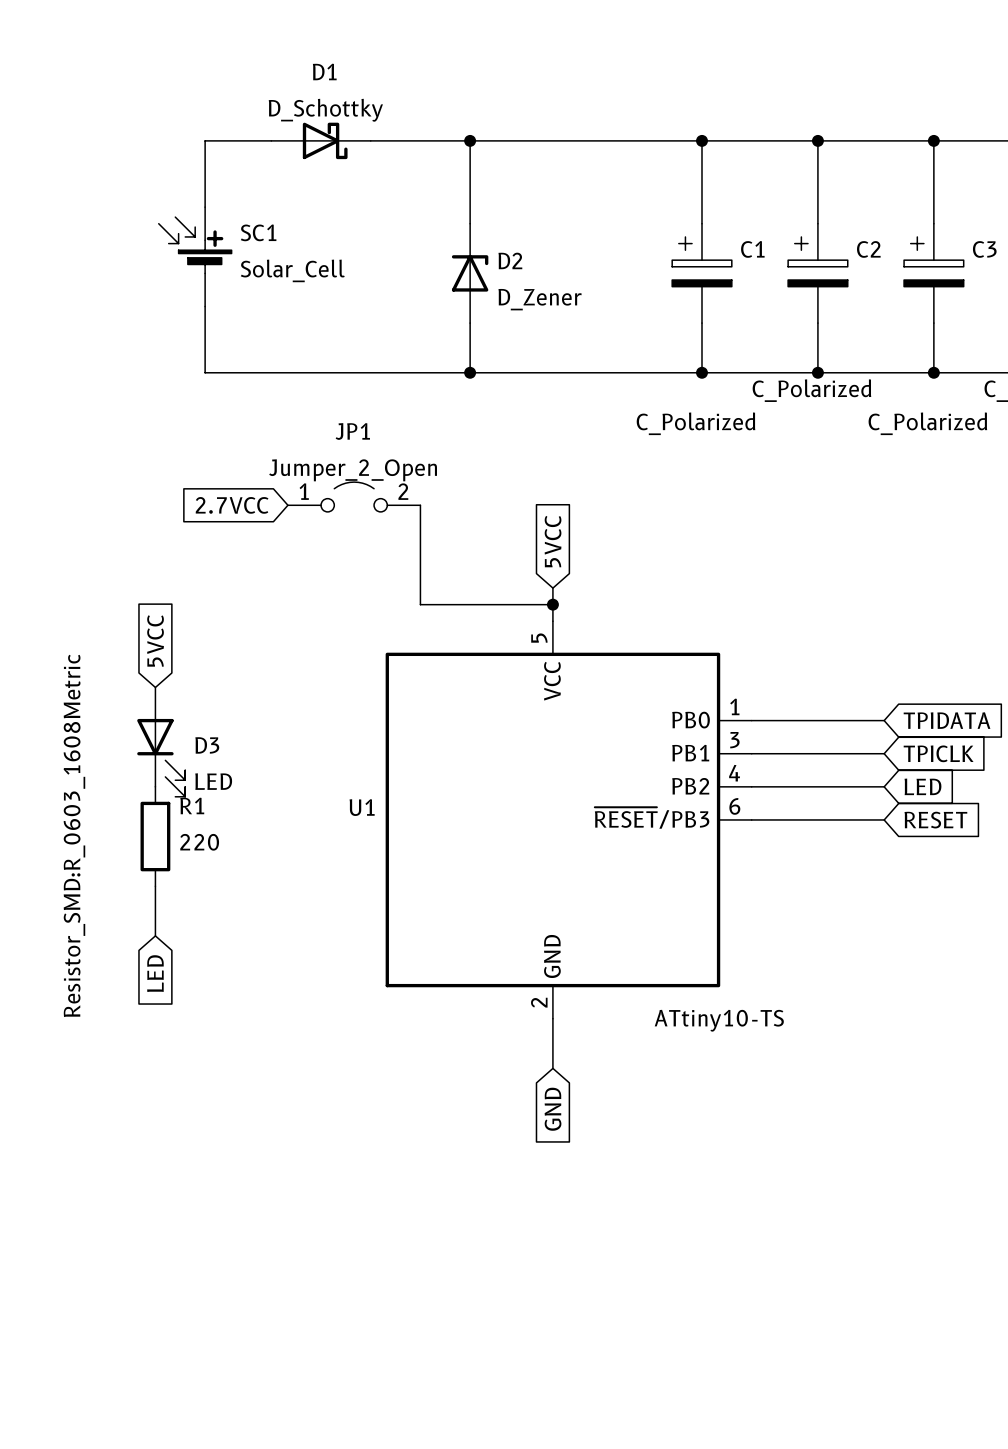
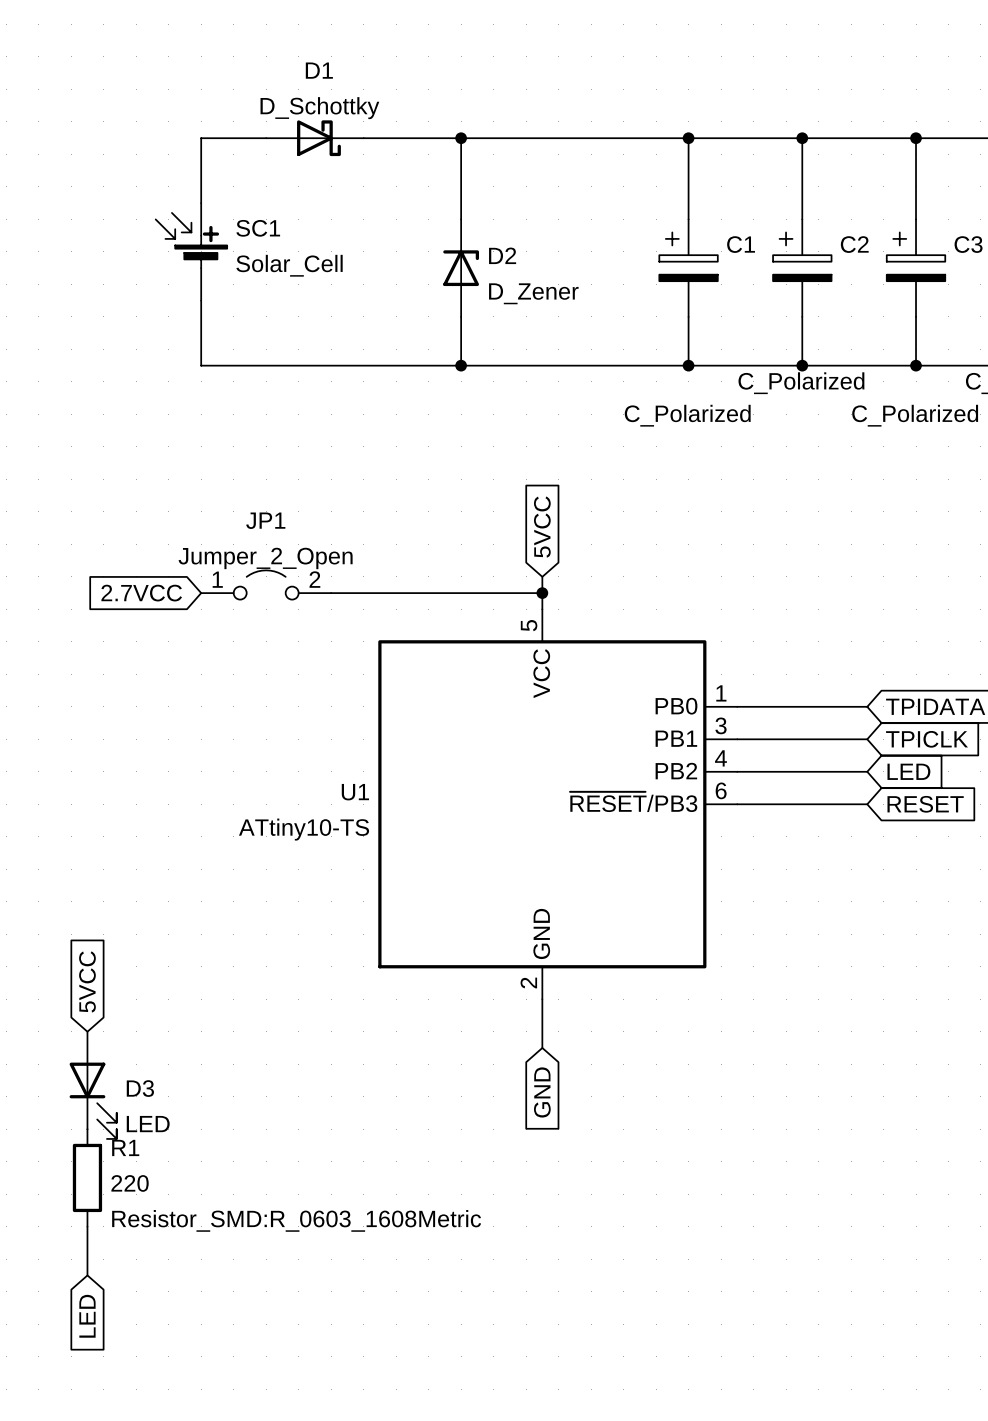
JP1 position: (354, 497) -> (266, 584)
global label position: 2.7VCC (232, 505) -> 2.7VCC (141, 593)
wire: (420, 505) (420, 604) -> (331, 593) (412, 593)
global label: 5VCC (155, 640) -> none
D3 position: (161, 742) -> (93, 1085)
R1 text rotation: 0° (74, 835) -> 90° clockwise (296, 1220)
R1 position: (155, 836) -> (87, 1177)
wire: (155, 886) (155, 935) -> none
global label: LED (155, 973) -> none
global label: none -> 5VCC (87, 981)
U1 value position: ATtiny10-TS (719, 1020) -> ATtiny10-TS (304, 829)
wire: none -> (87, 1226) (87, 1275)
global label: none -> LED (87, 1316)

